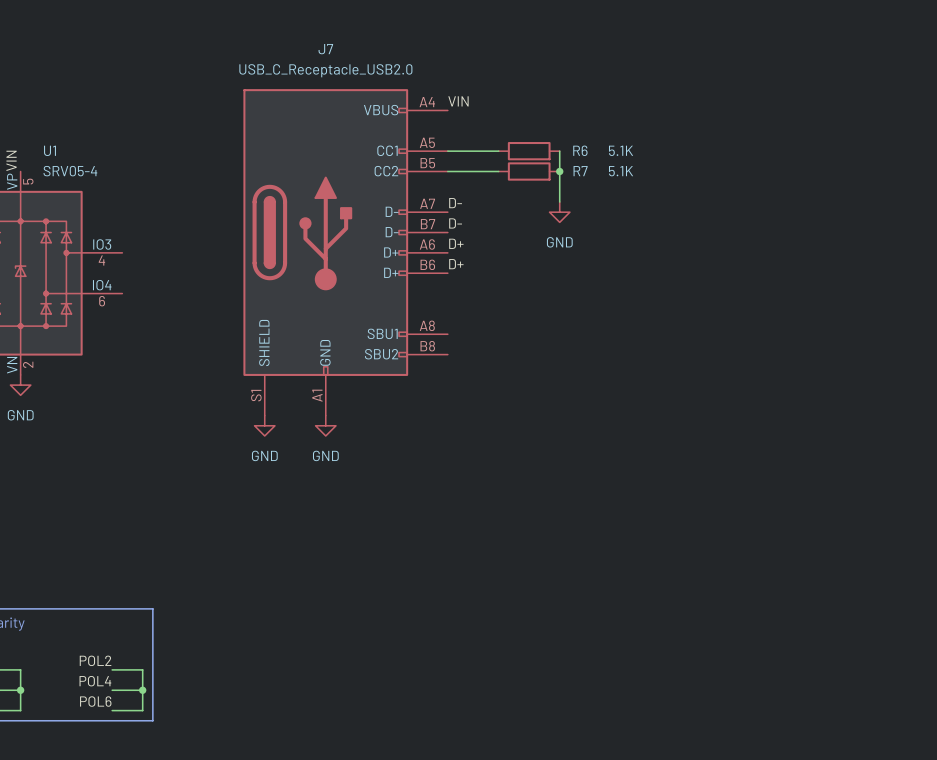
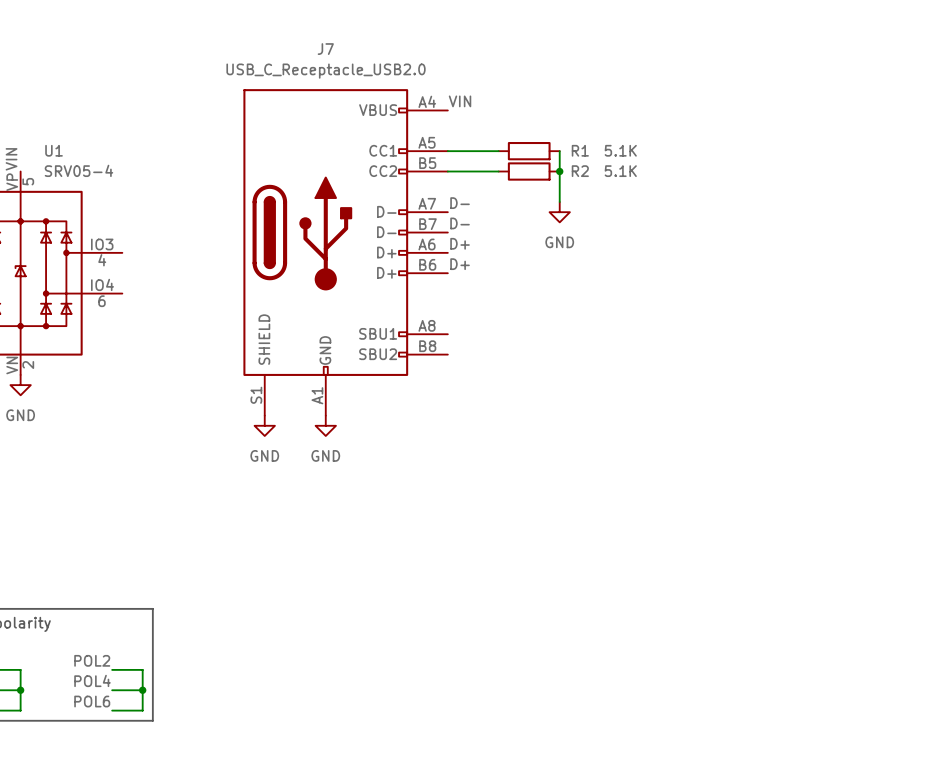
R6 name: R6 (580, 150) -> R1 (580, 150)
R7 name: R7 (580, 171) -> R2 (580, 171)

